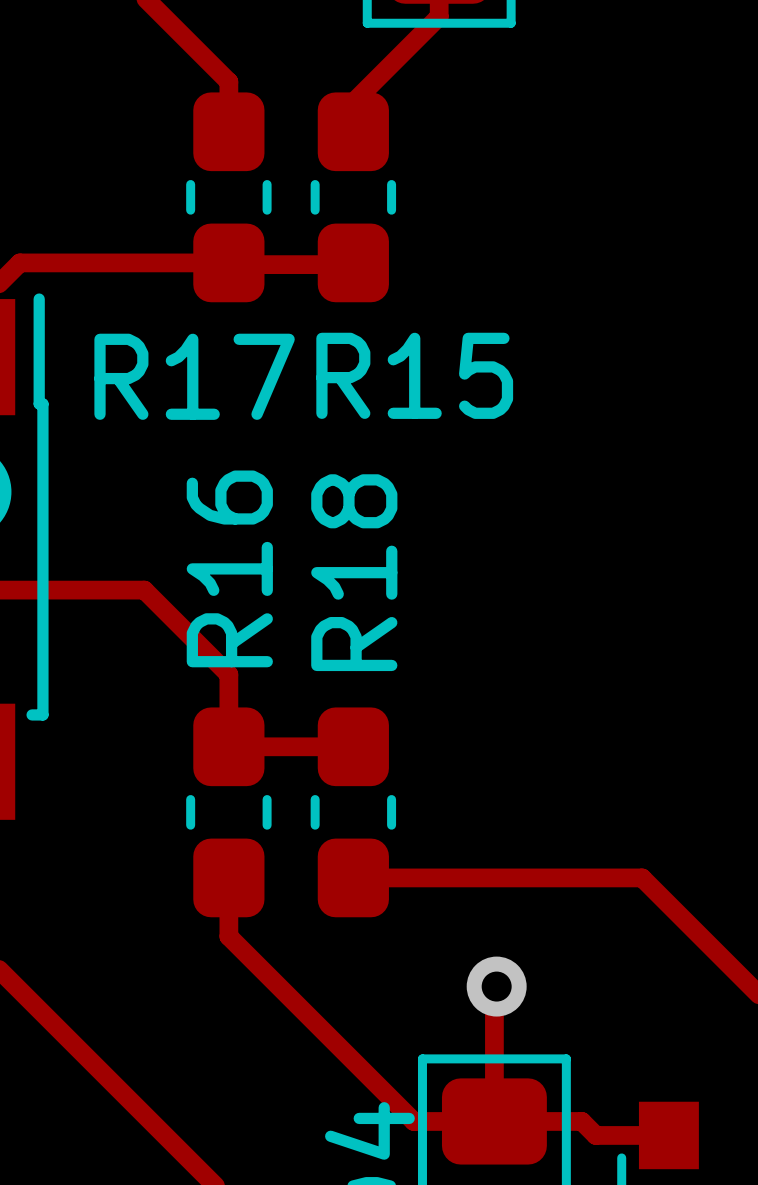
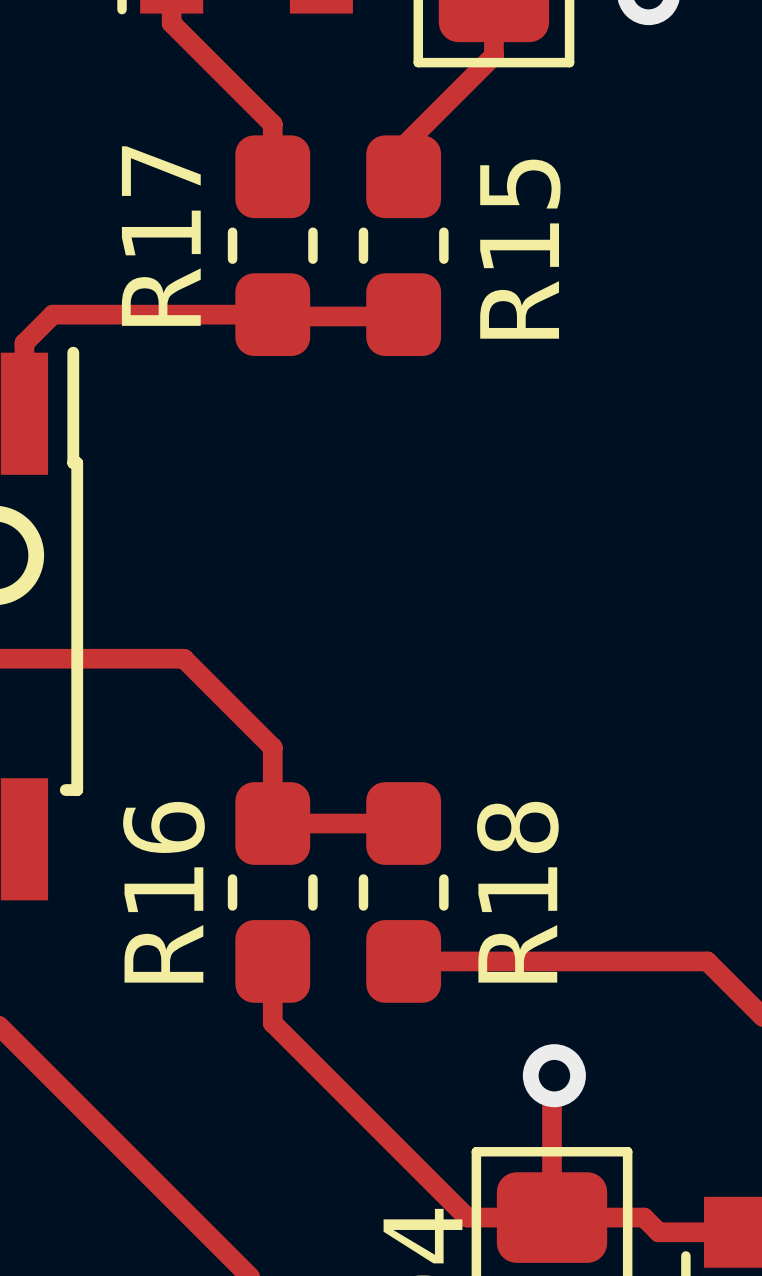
R15 name rotation: 0° (414, 375) -> 90° counterclockwise (520, 249)
R17 name rotation: 0° (194, 376) -> 90° counterclockwise (161, 236)
R16 name position: R16 (229, 568) -> R16 (163, 892)
R18 name position: R18 (354, 572) -> R18 (517, 892)

